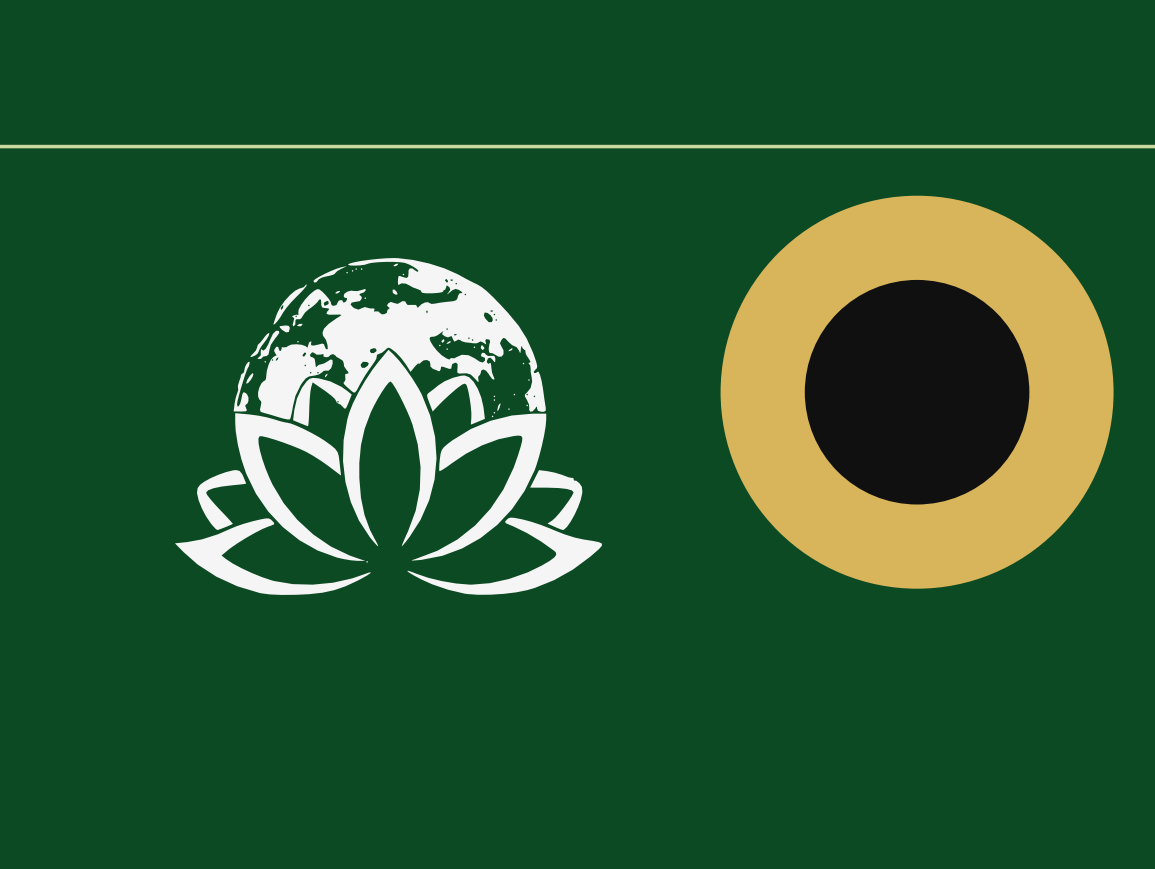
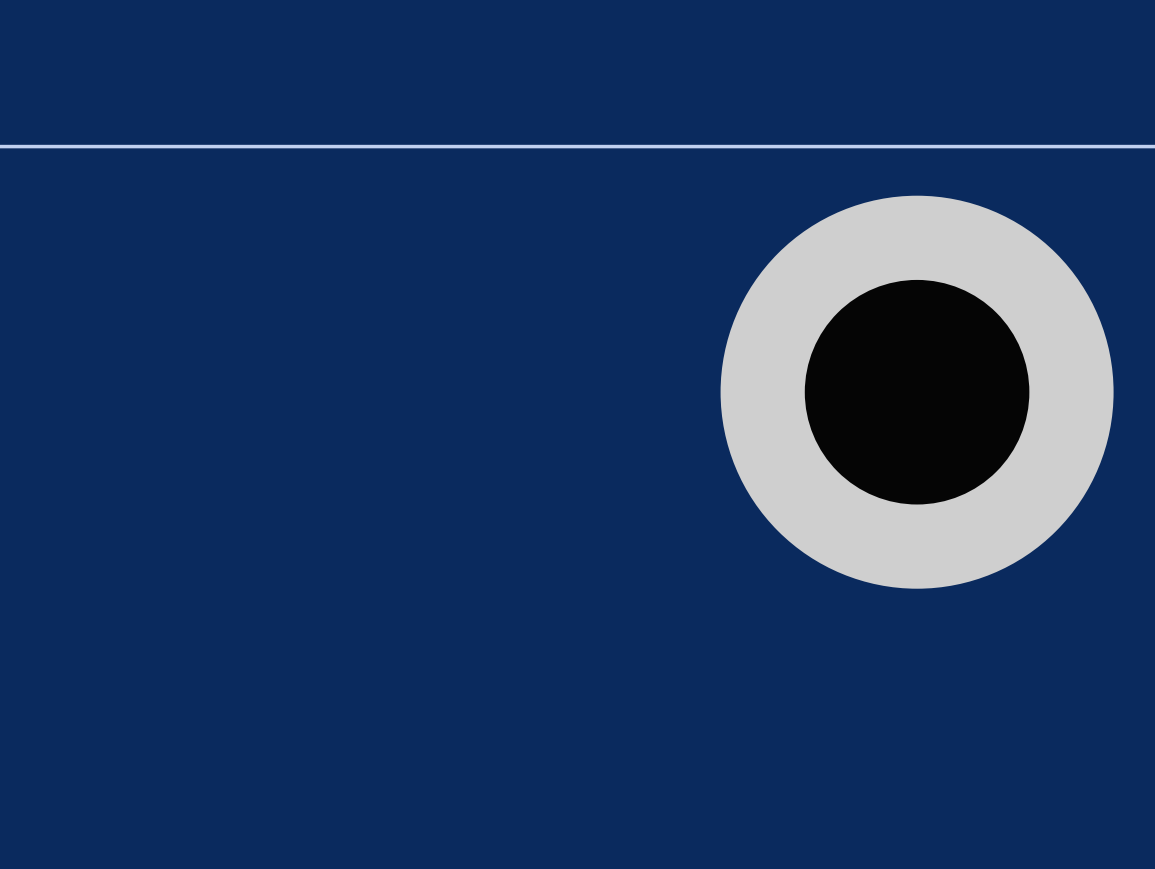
drawing: [174, 258, 602, 595] -> none

